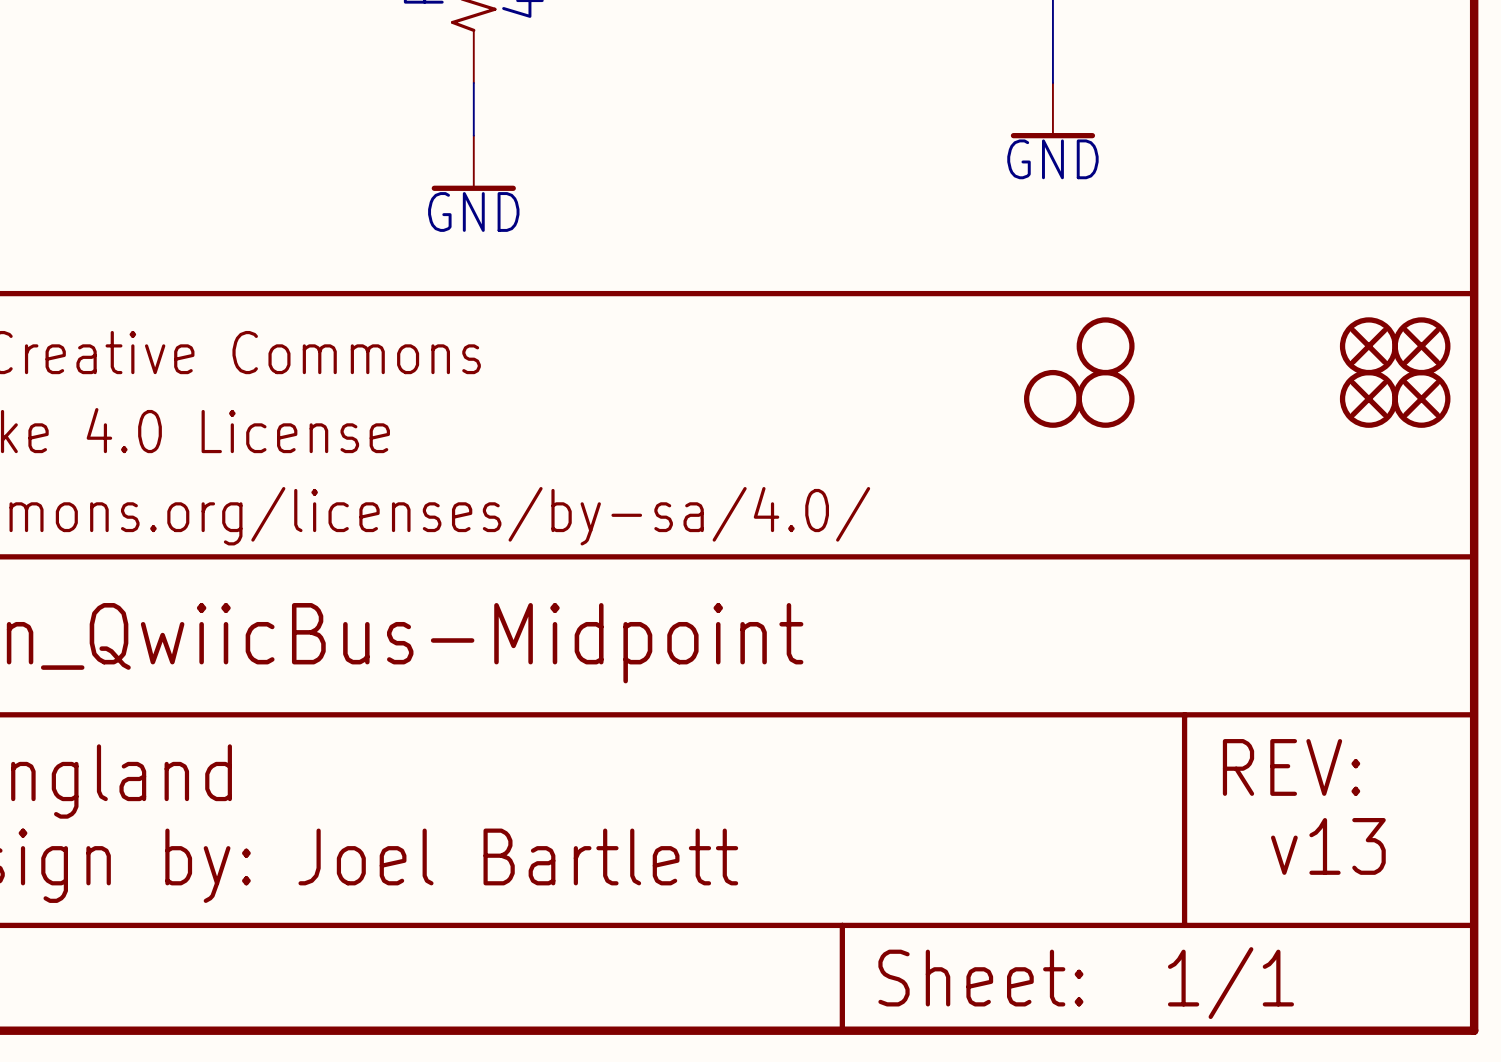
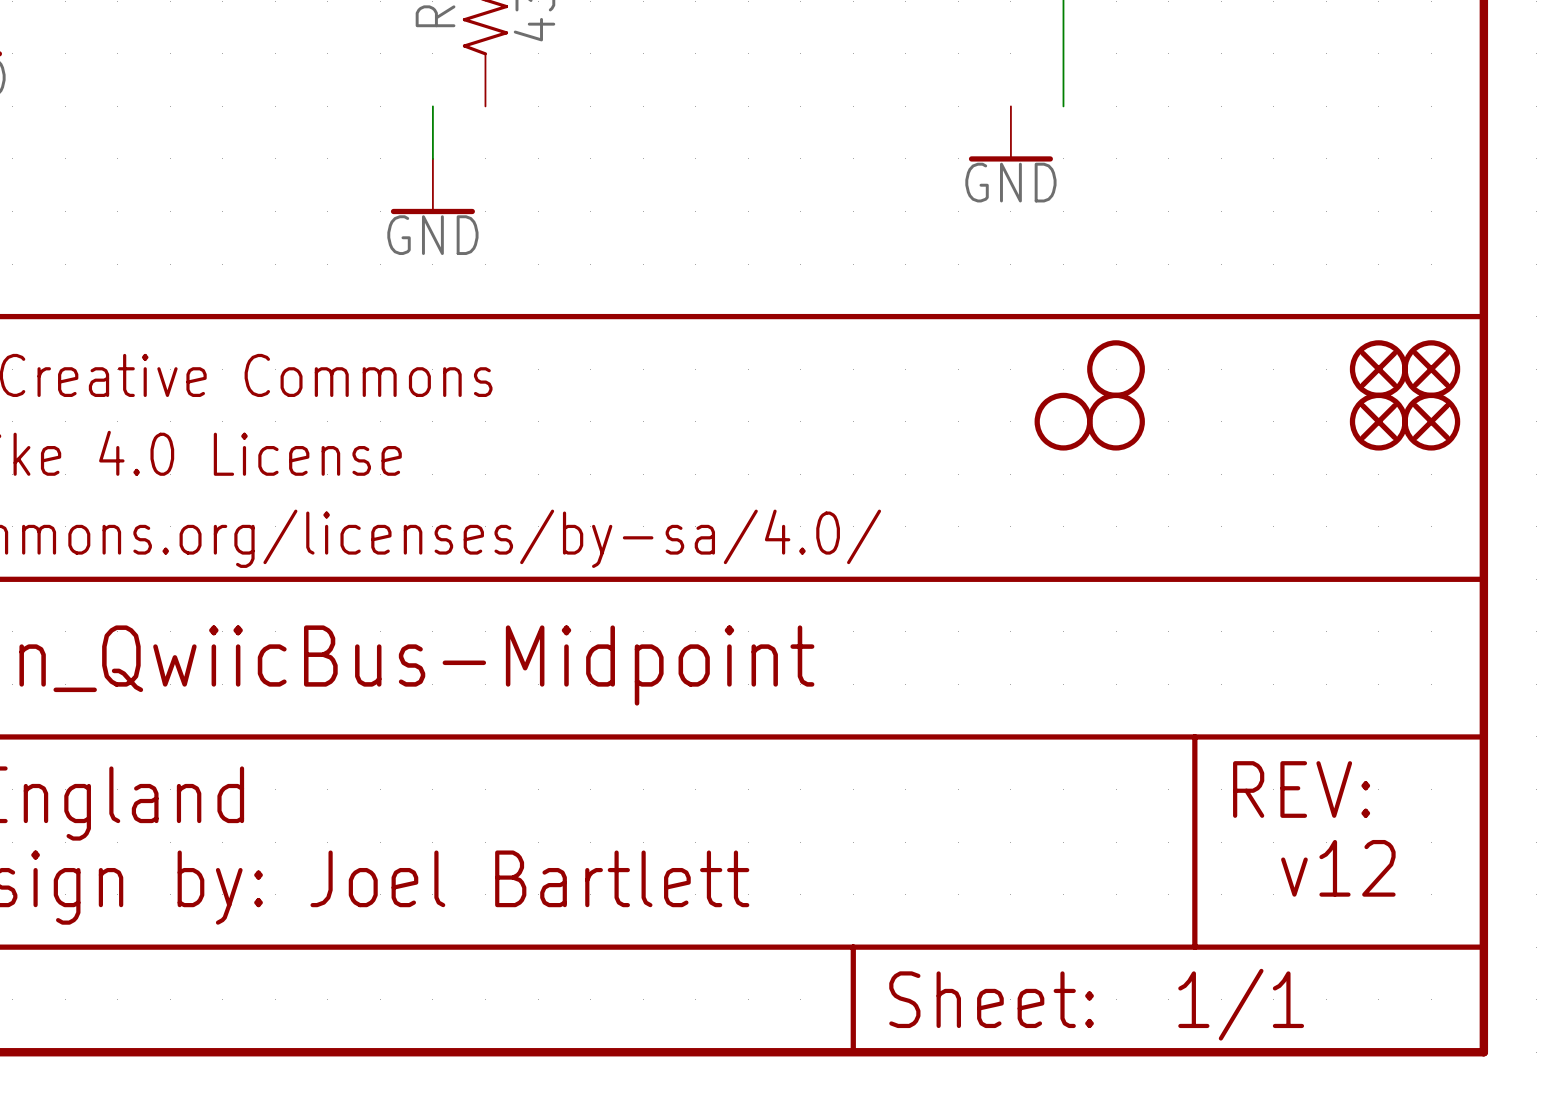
wire: (473, 82) (473, 135) -> (432, 106) (432, 158)
power symbol position: GND (1052, 110) -> GND (1010, 133)
power symbol position: GND (473, 163) -> GND (432, 186)
text: v13 (1328, 846) -> v12 (1338, 868)

